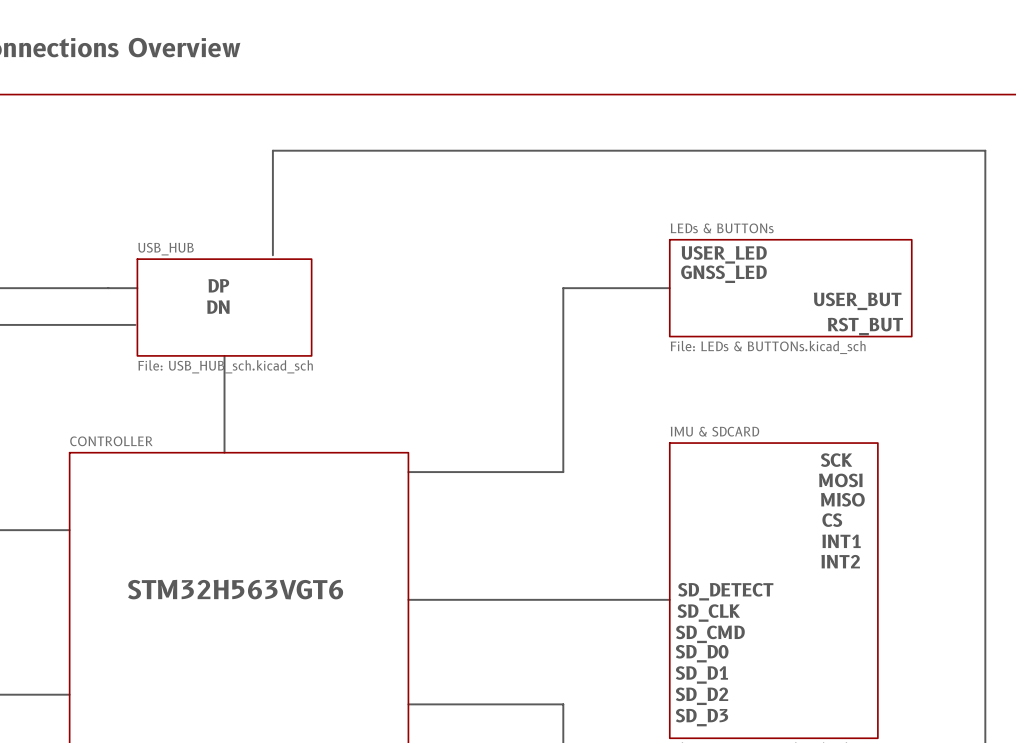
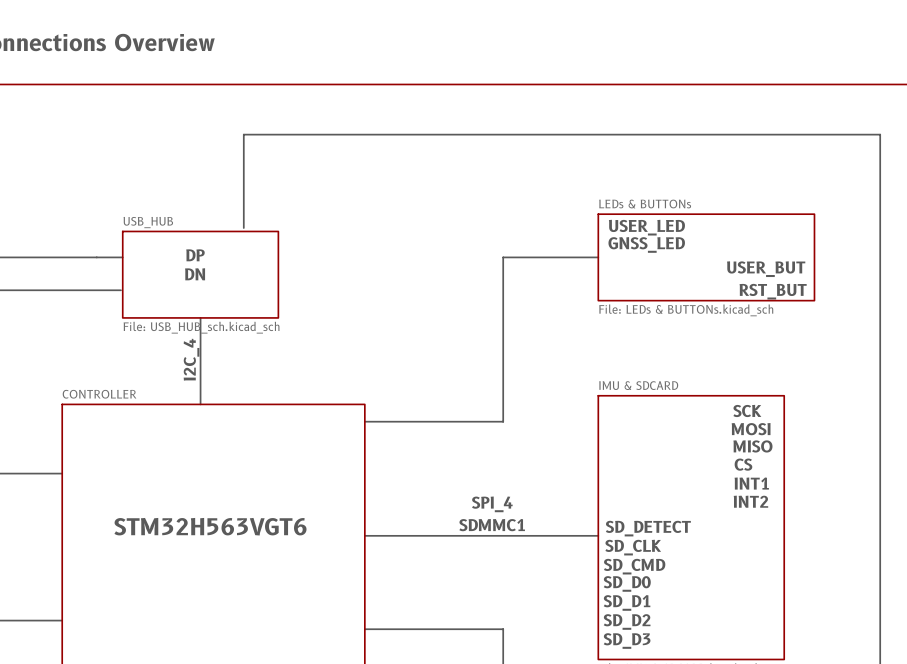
text: none -> I2C_4 (191, 359)
text: none -> SPI_4 (492, 504)
text: none -> SDMMC1 (492, 525)

